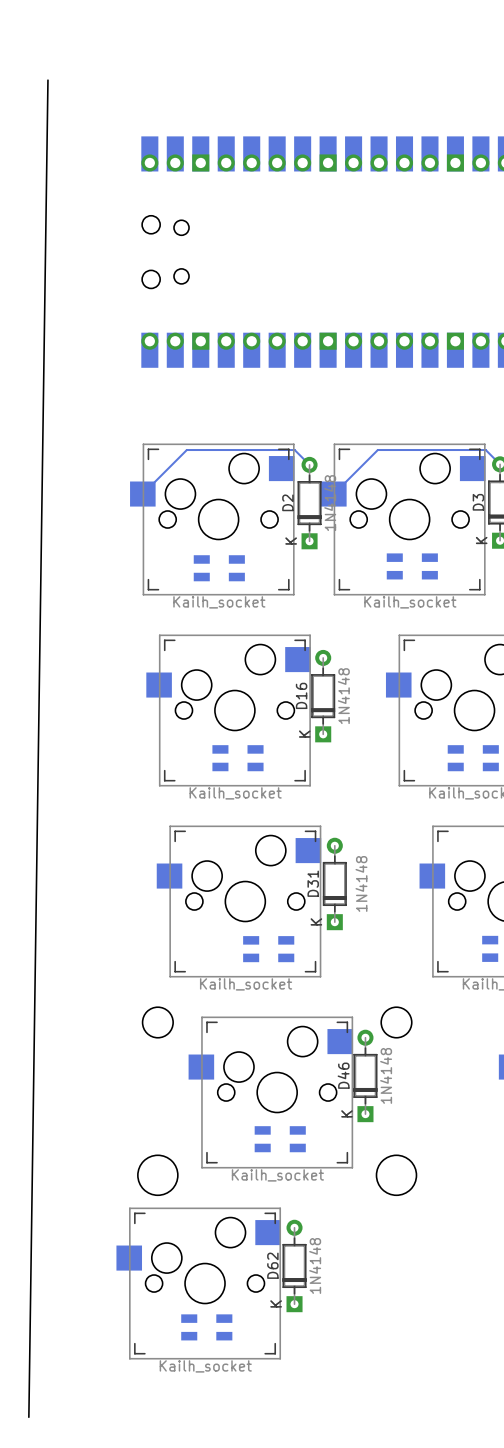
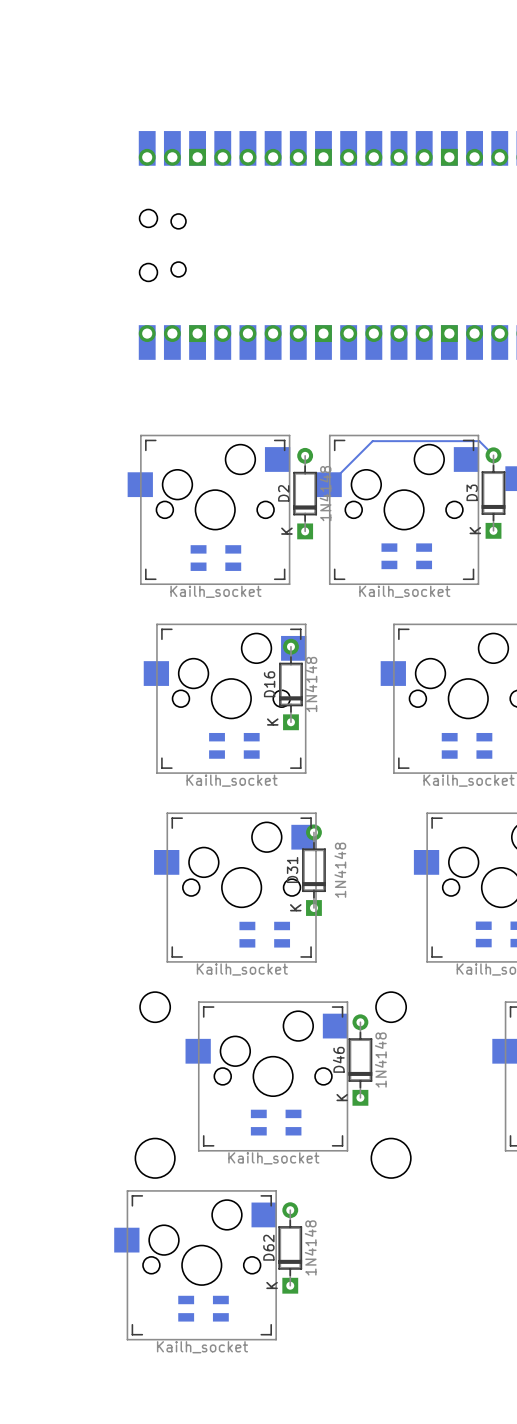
board edge: (47, 80) (28, 1417) -> none
bottom track: (309, 464) (294, 450) (186, 450) (142, 494) -> none
D16 position: (323, 696) -> (290, 684)
D31 position: (334, 883) -> (313, 870)

